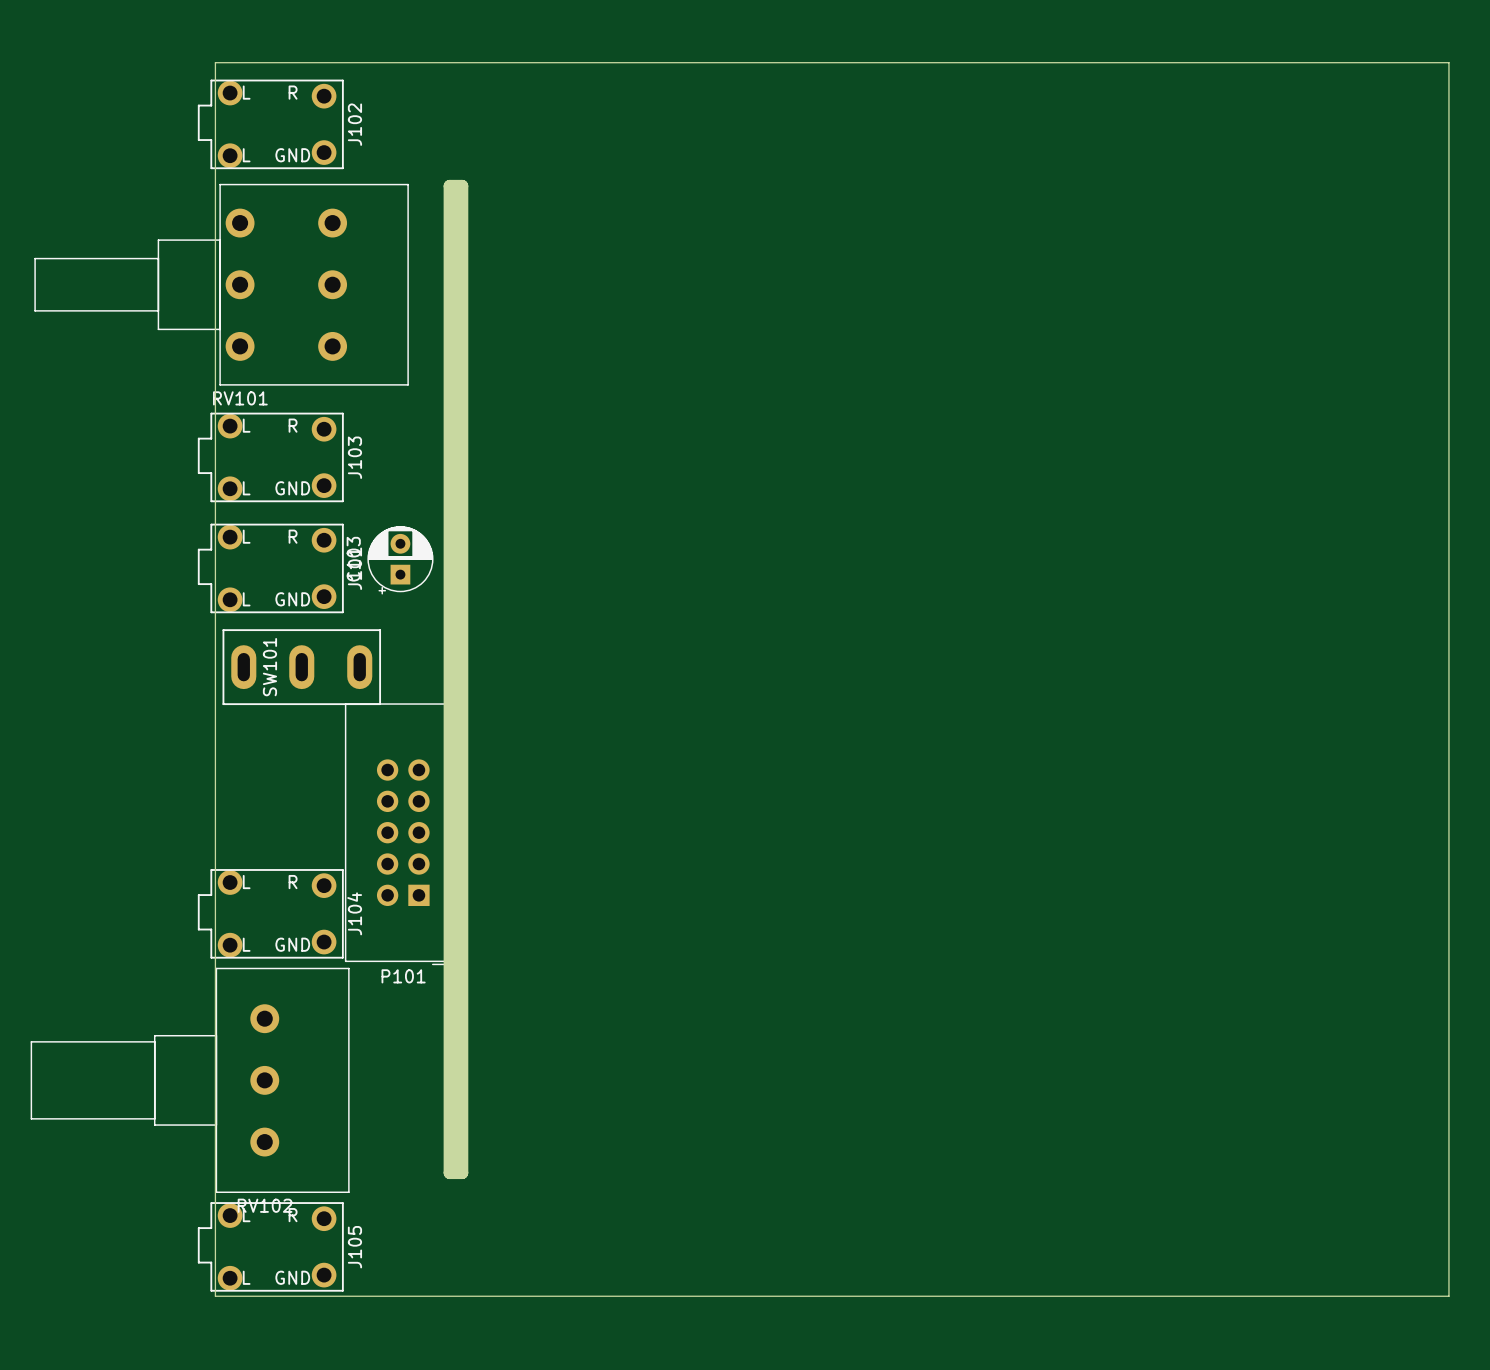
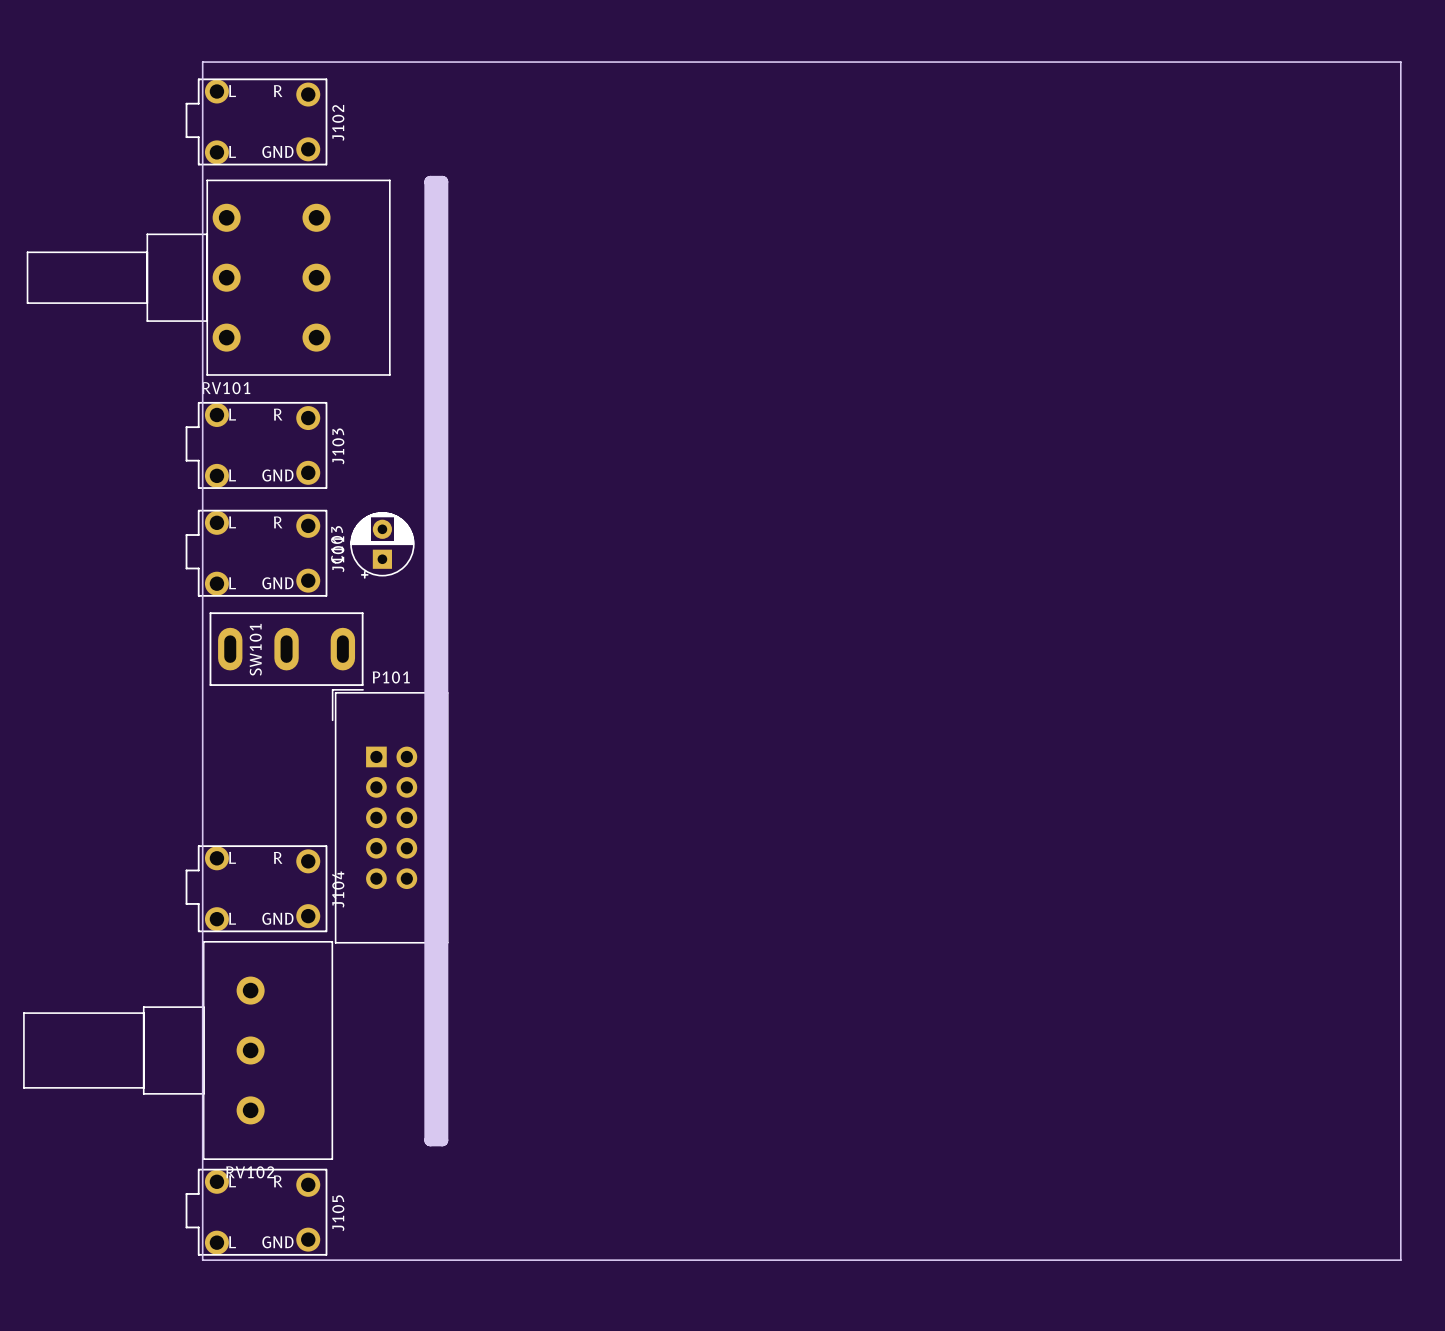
P101 rotation: 0° (404, 834) -> 180° (390, 816)

